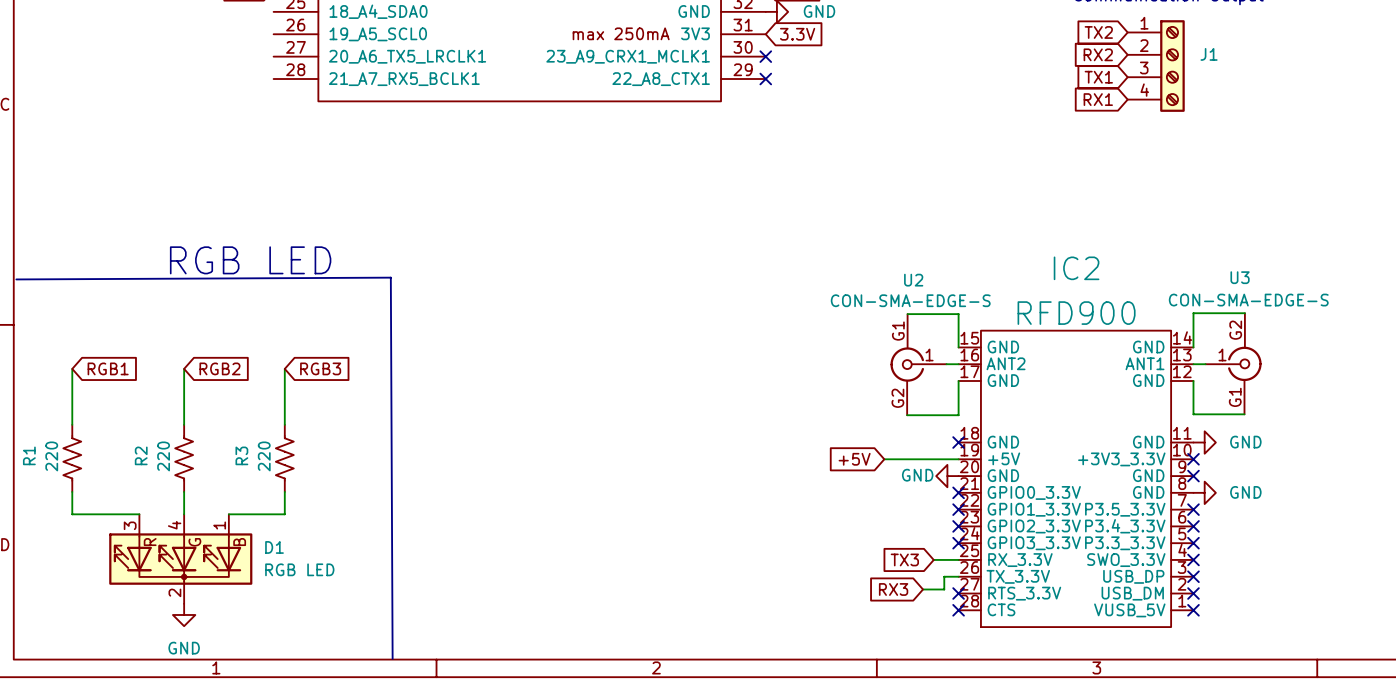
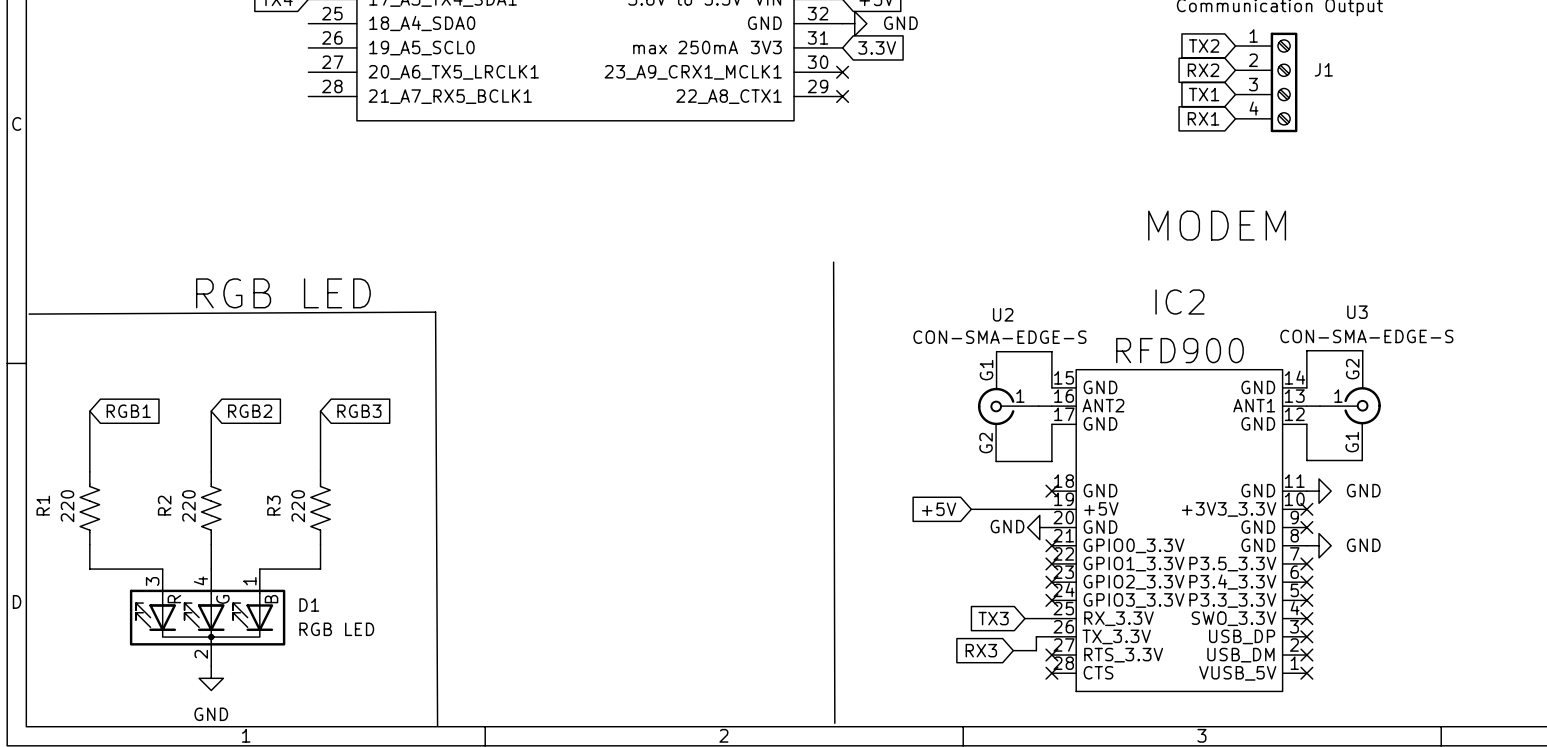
text: none -> MODEM (1217, 225)
line: none -> (833, 262) (834, 723)

